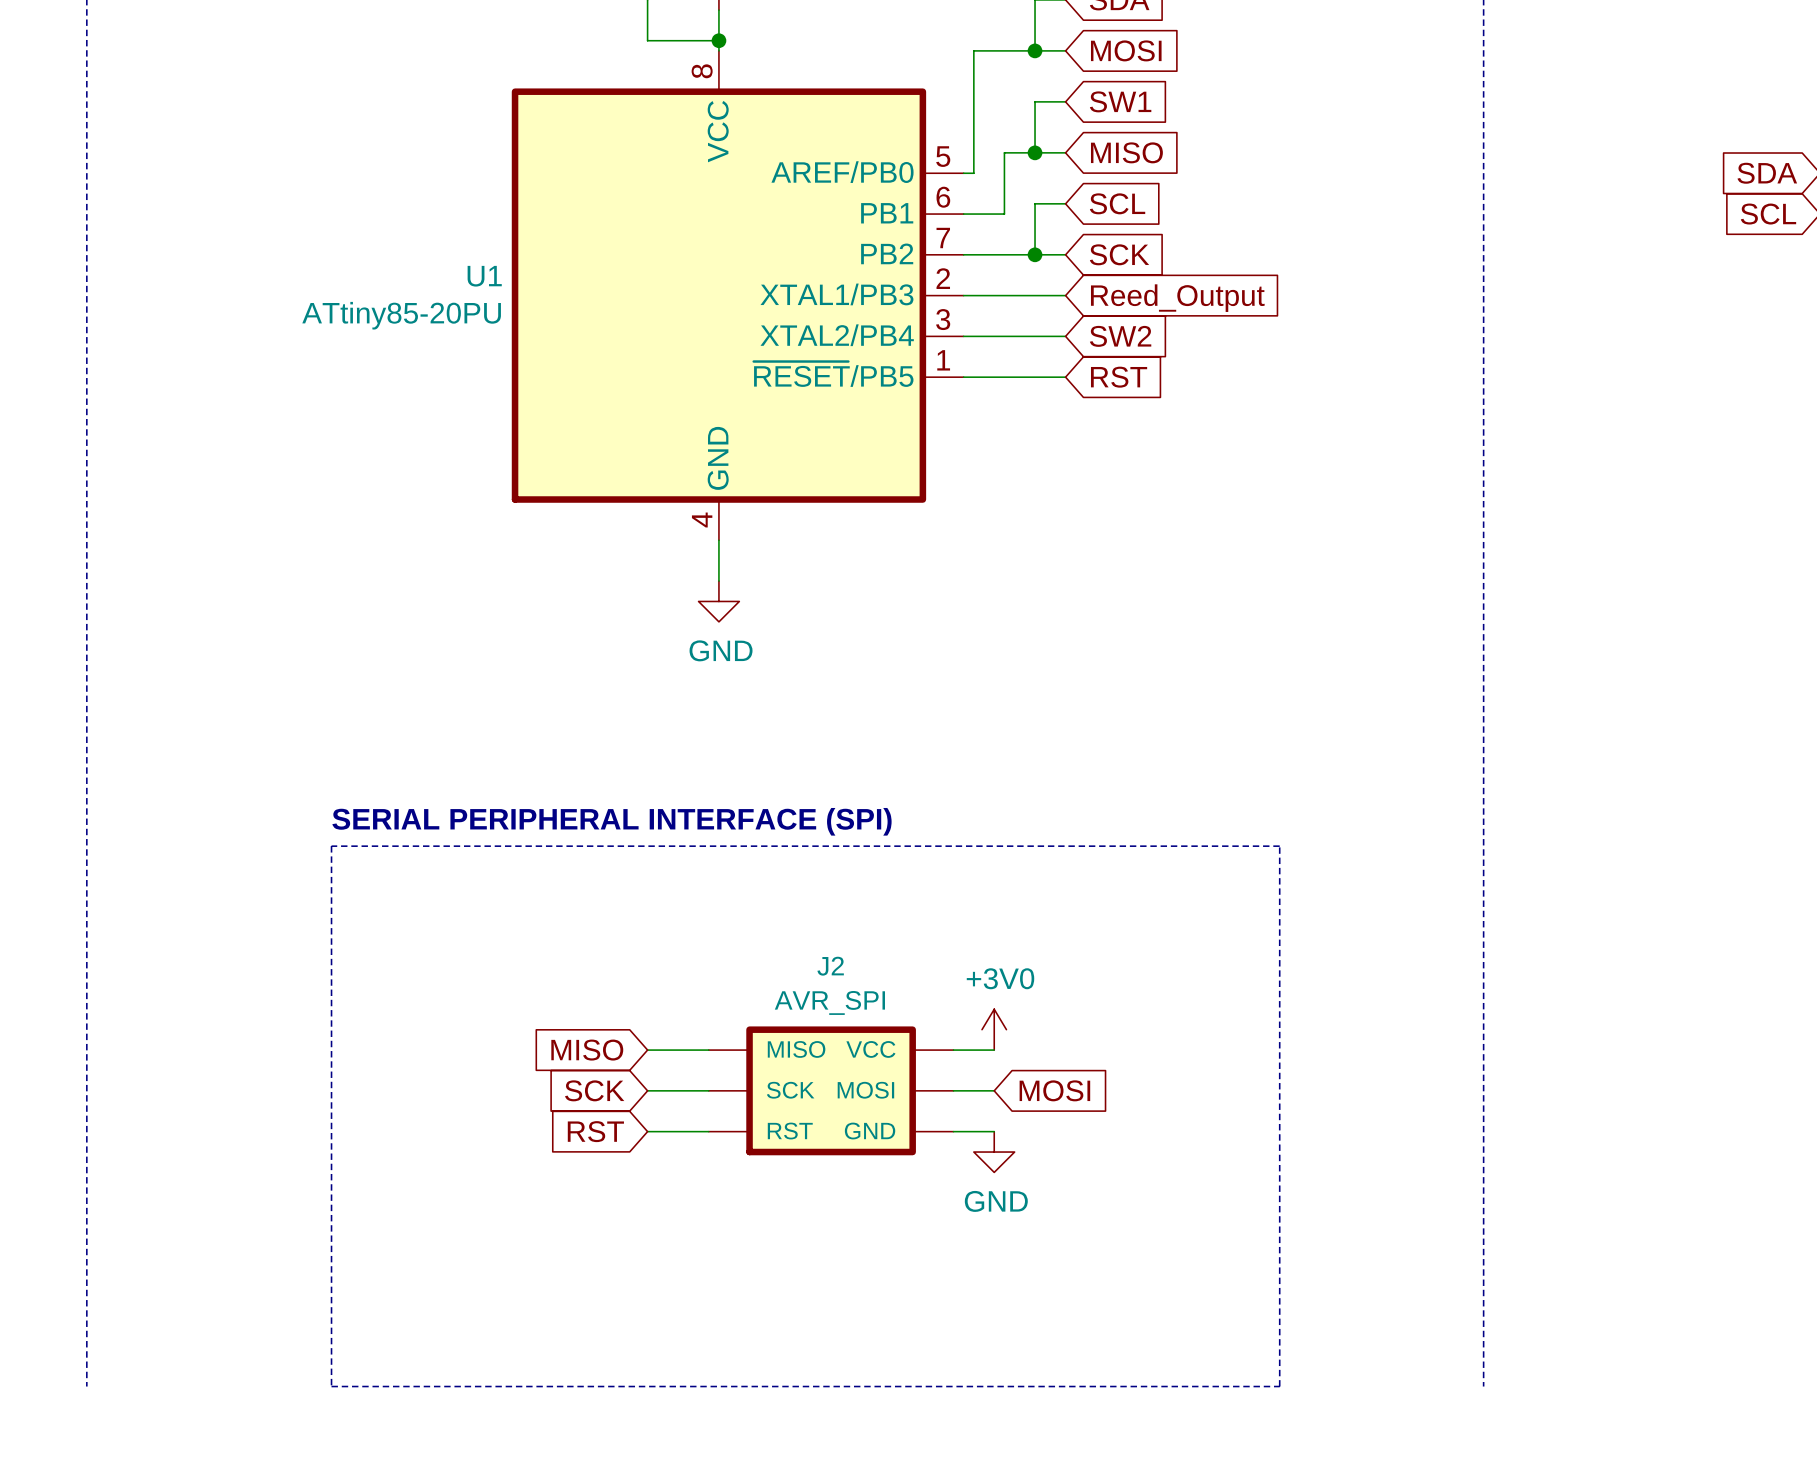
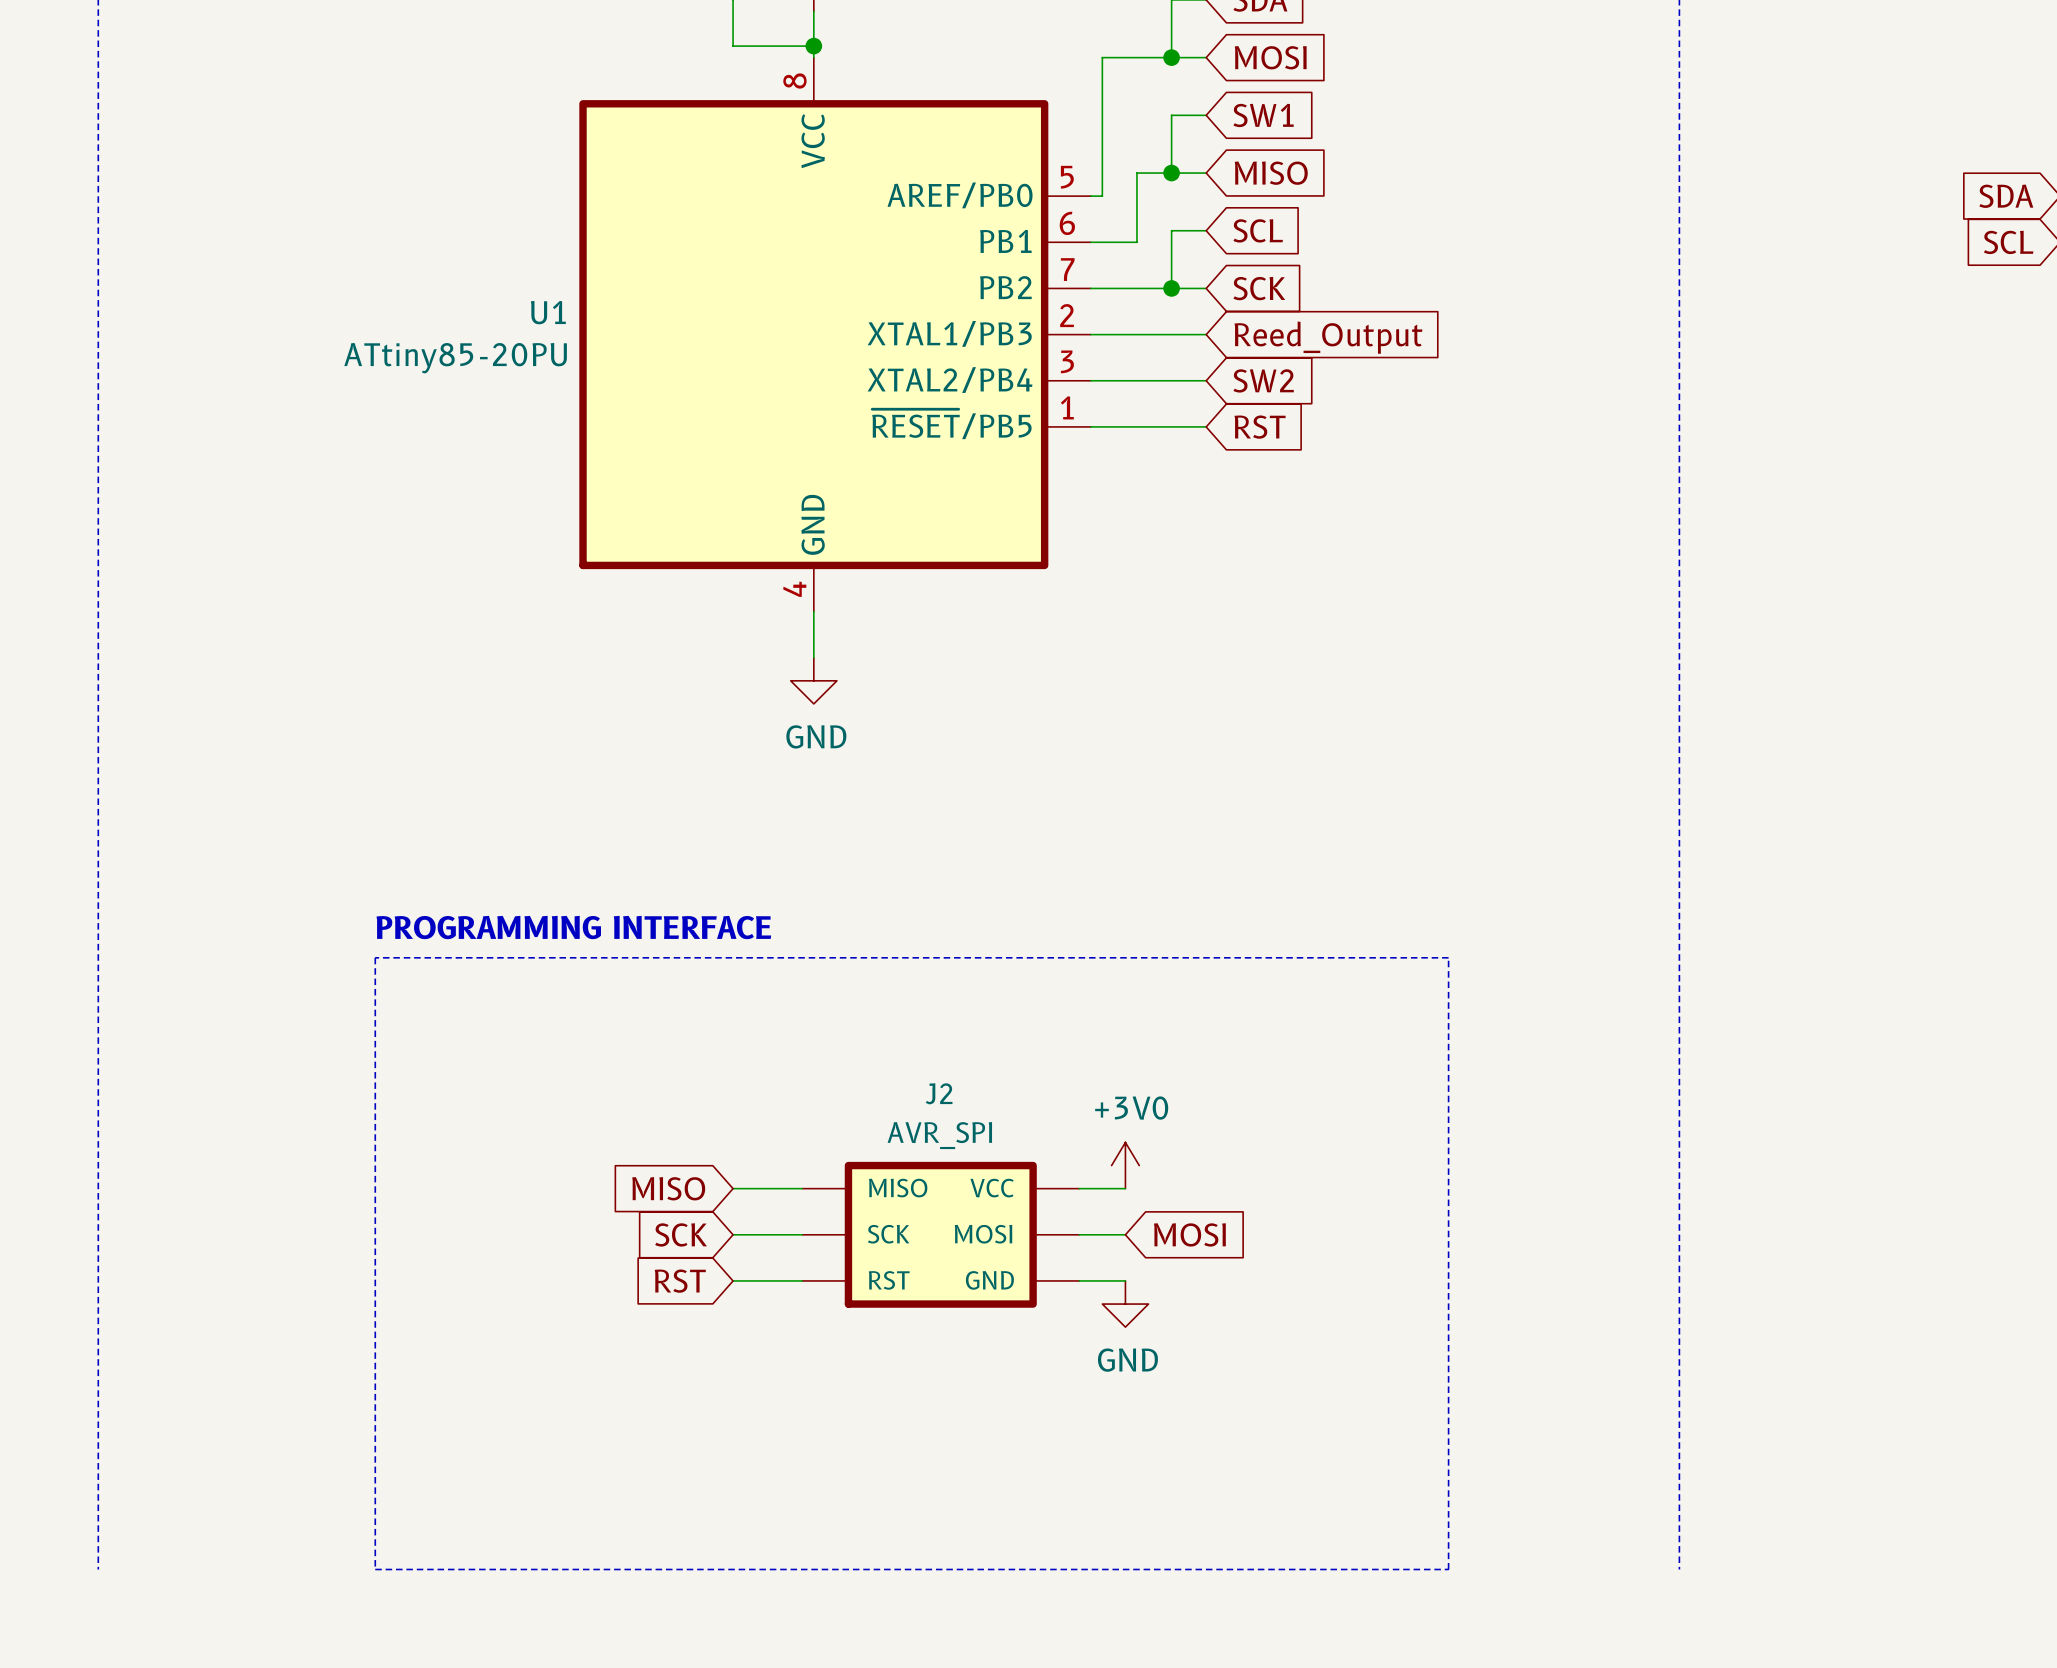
text: SERIAL PERIPHERAL INTERFACE (SPI) (611, 821) -> PROGRAMMING INTERFACE (573, 927)

